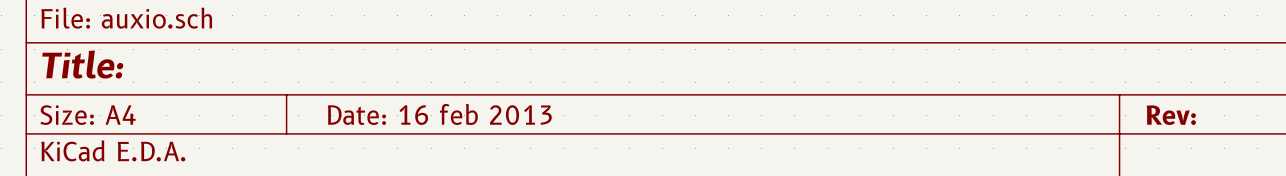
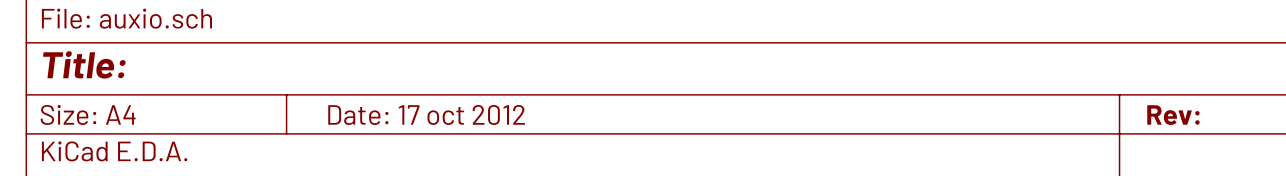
title block: Date: 16 feb 2013 (439, 114) -> Date: 17 oct 2012 (426, 114)

